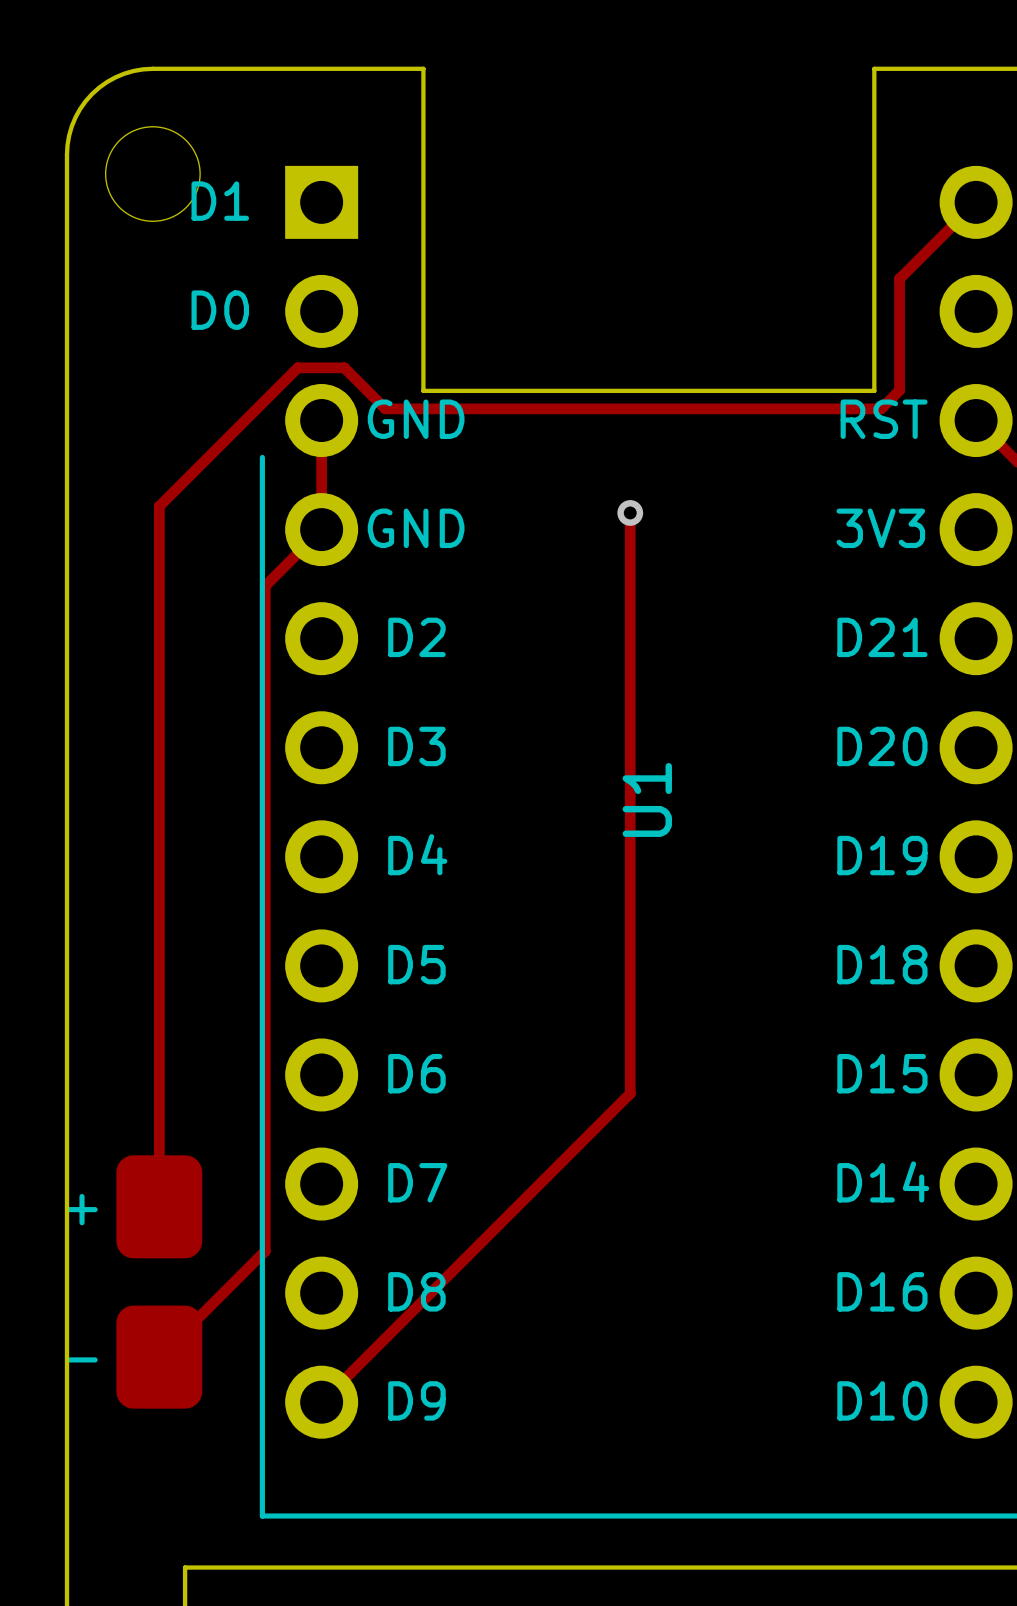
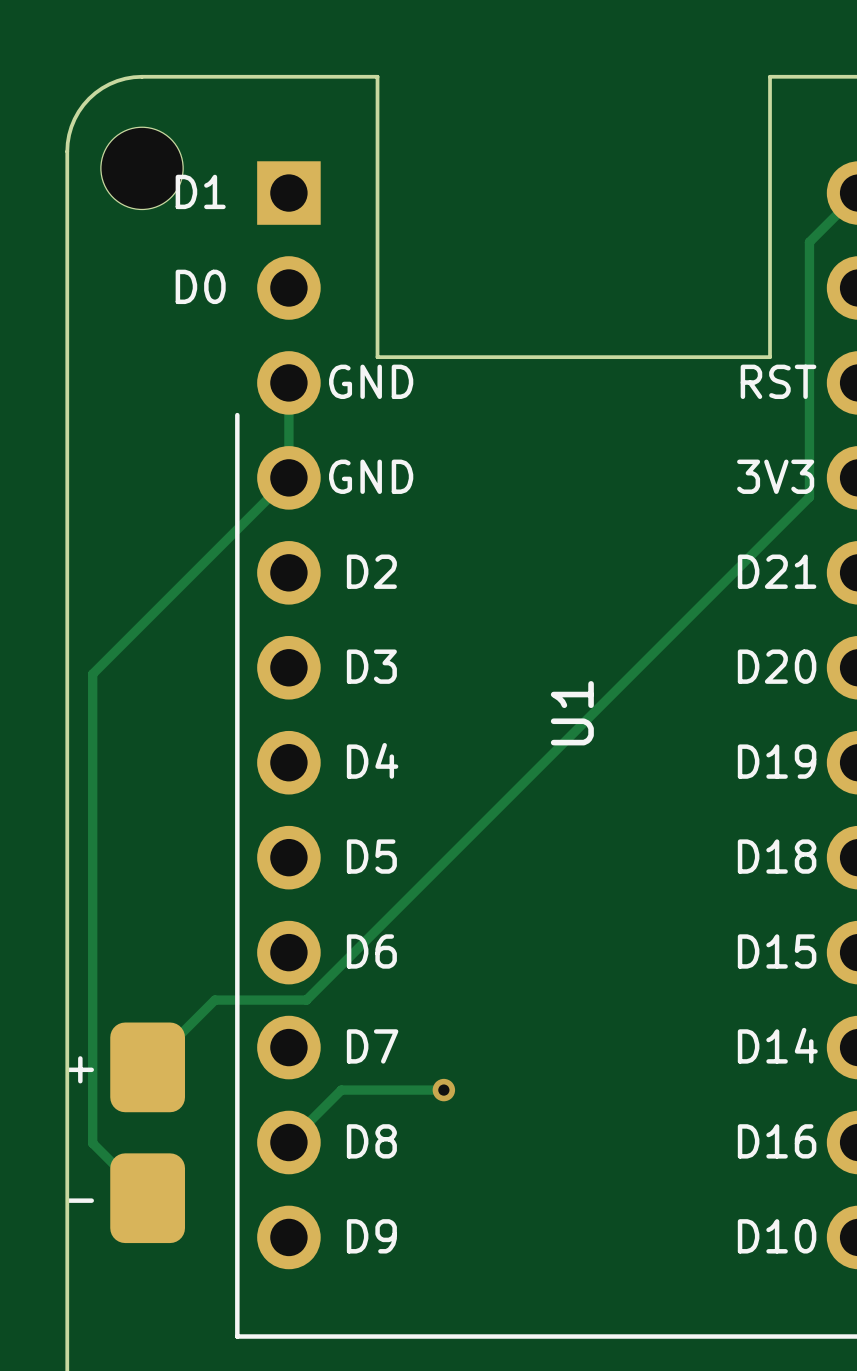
track: (919, 258) (899, 278) (899, 390) (881, 408) (385, 408) (344, 367) (297, 367) (159, 506) (159, 1206) -> (809, 242) (809, 497) (306, 1000) (214, 1000) (147, 1067)
track: (630, 512) (630, 1093) (321, 1402) -> none
via: (630, 512) -> none
track: (265, 586) (265, 1251) (159, 1357) -> (239, 527) (92, 674) (92, 1143) (147, 1198)
track: none -> (443, 1090) (341, 1090) (288, 1142)
via: none -> (443, 1090)

